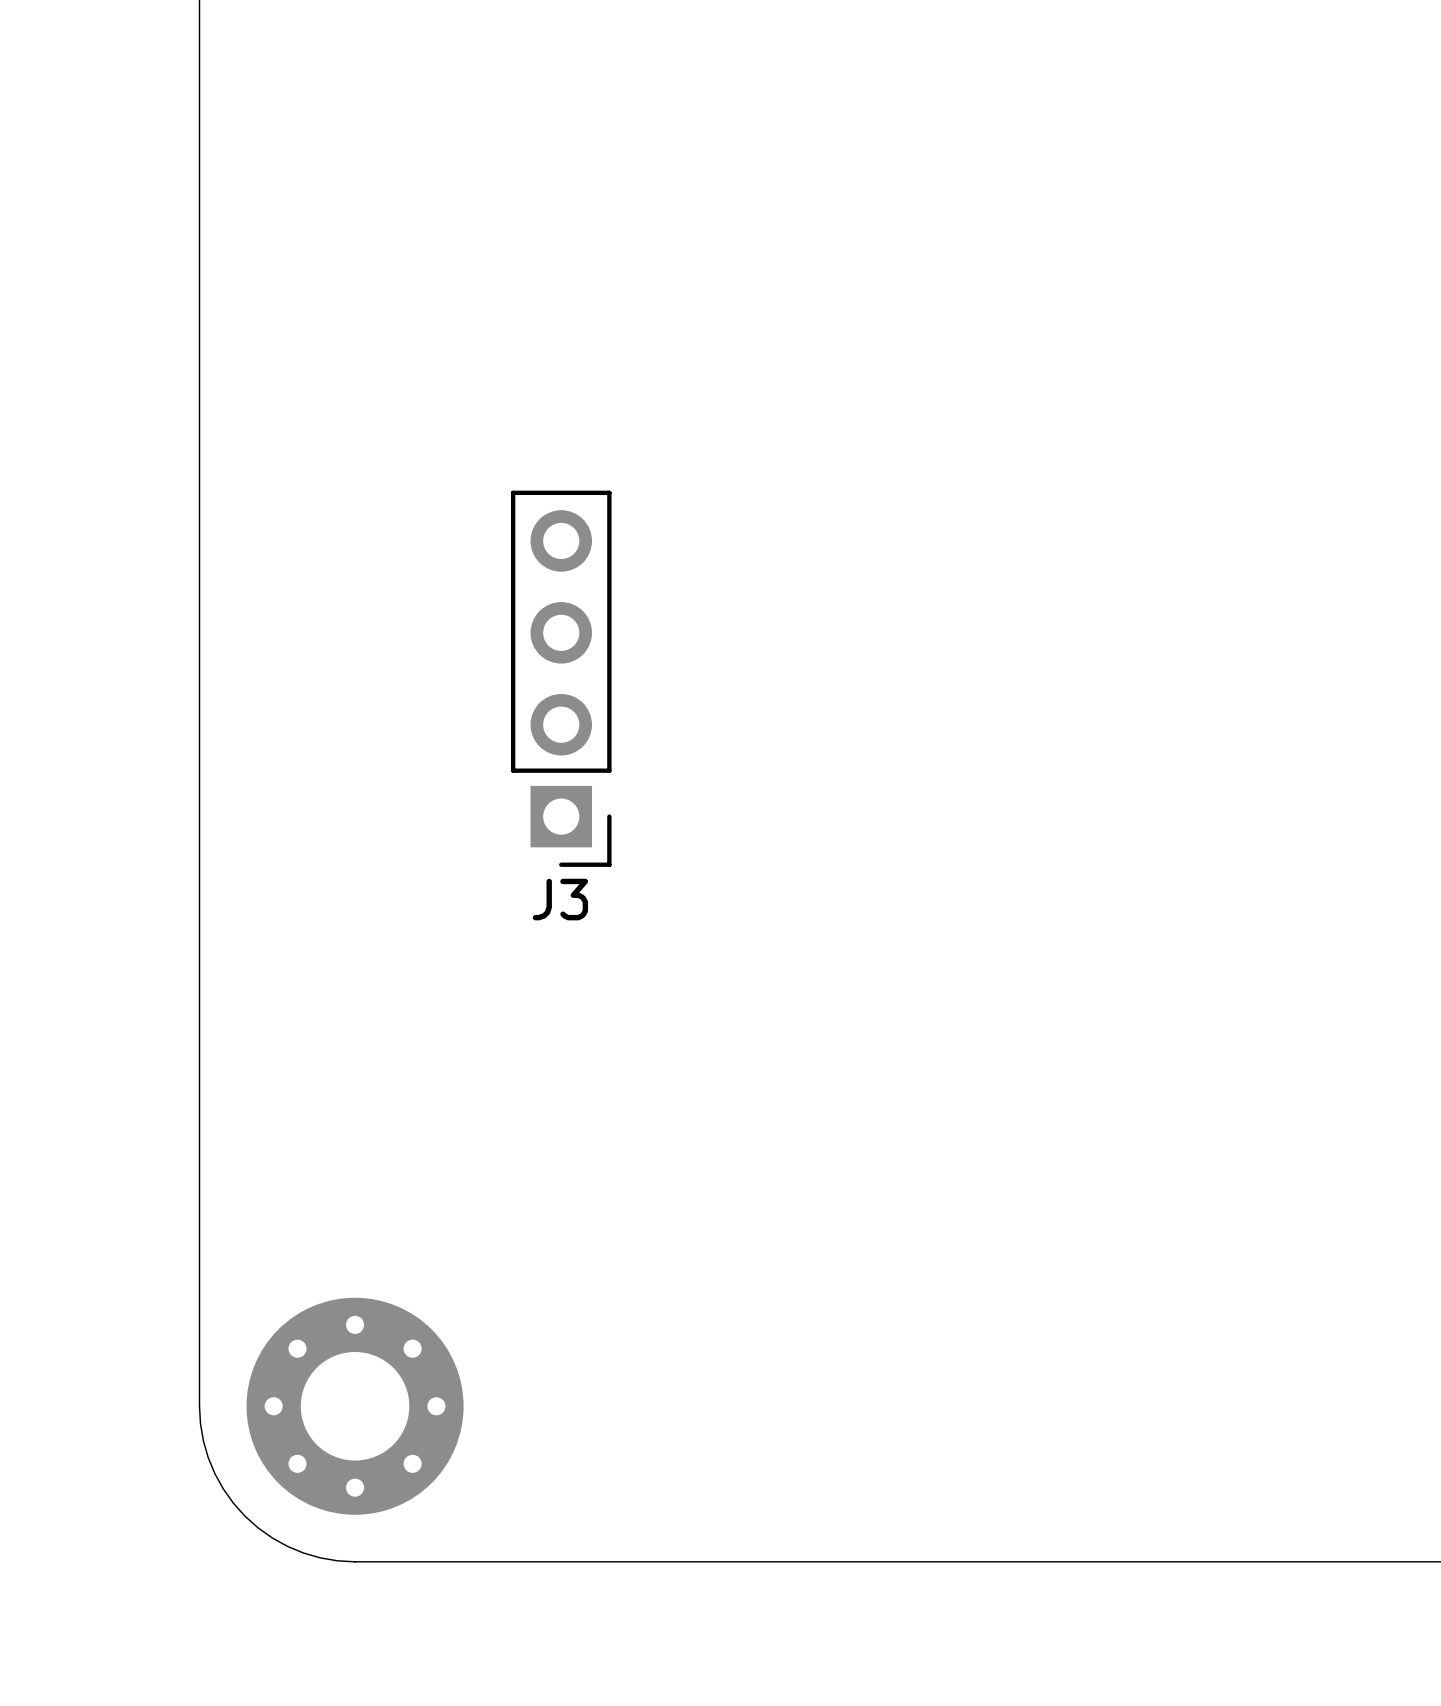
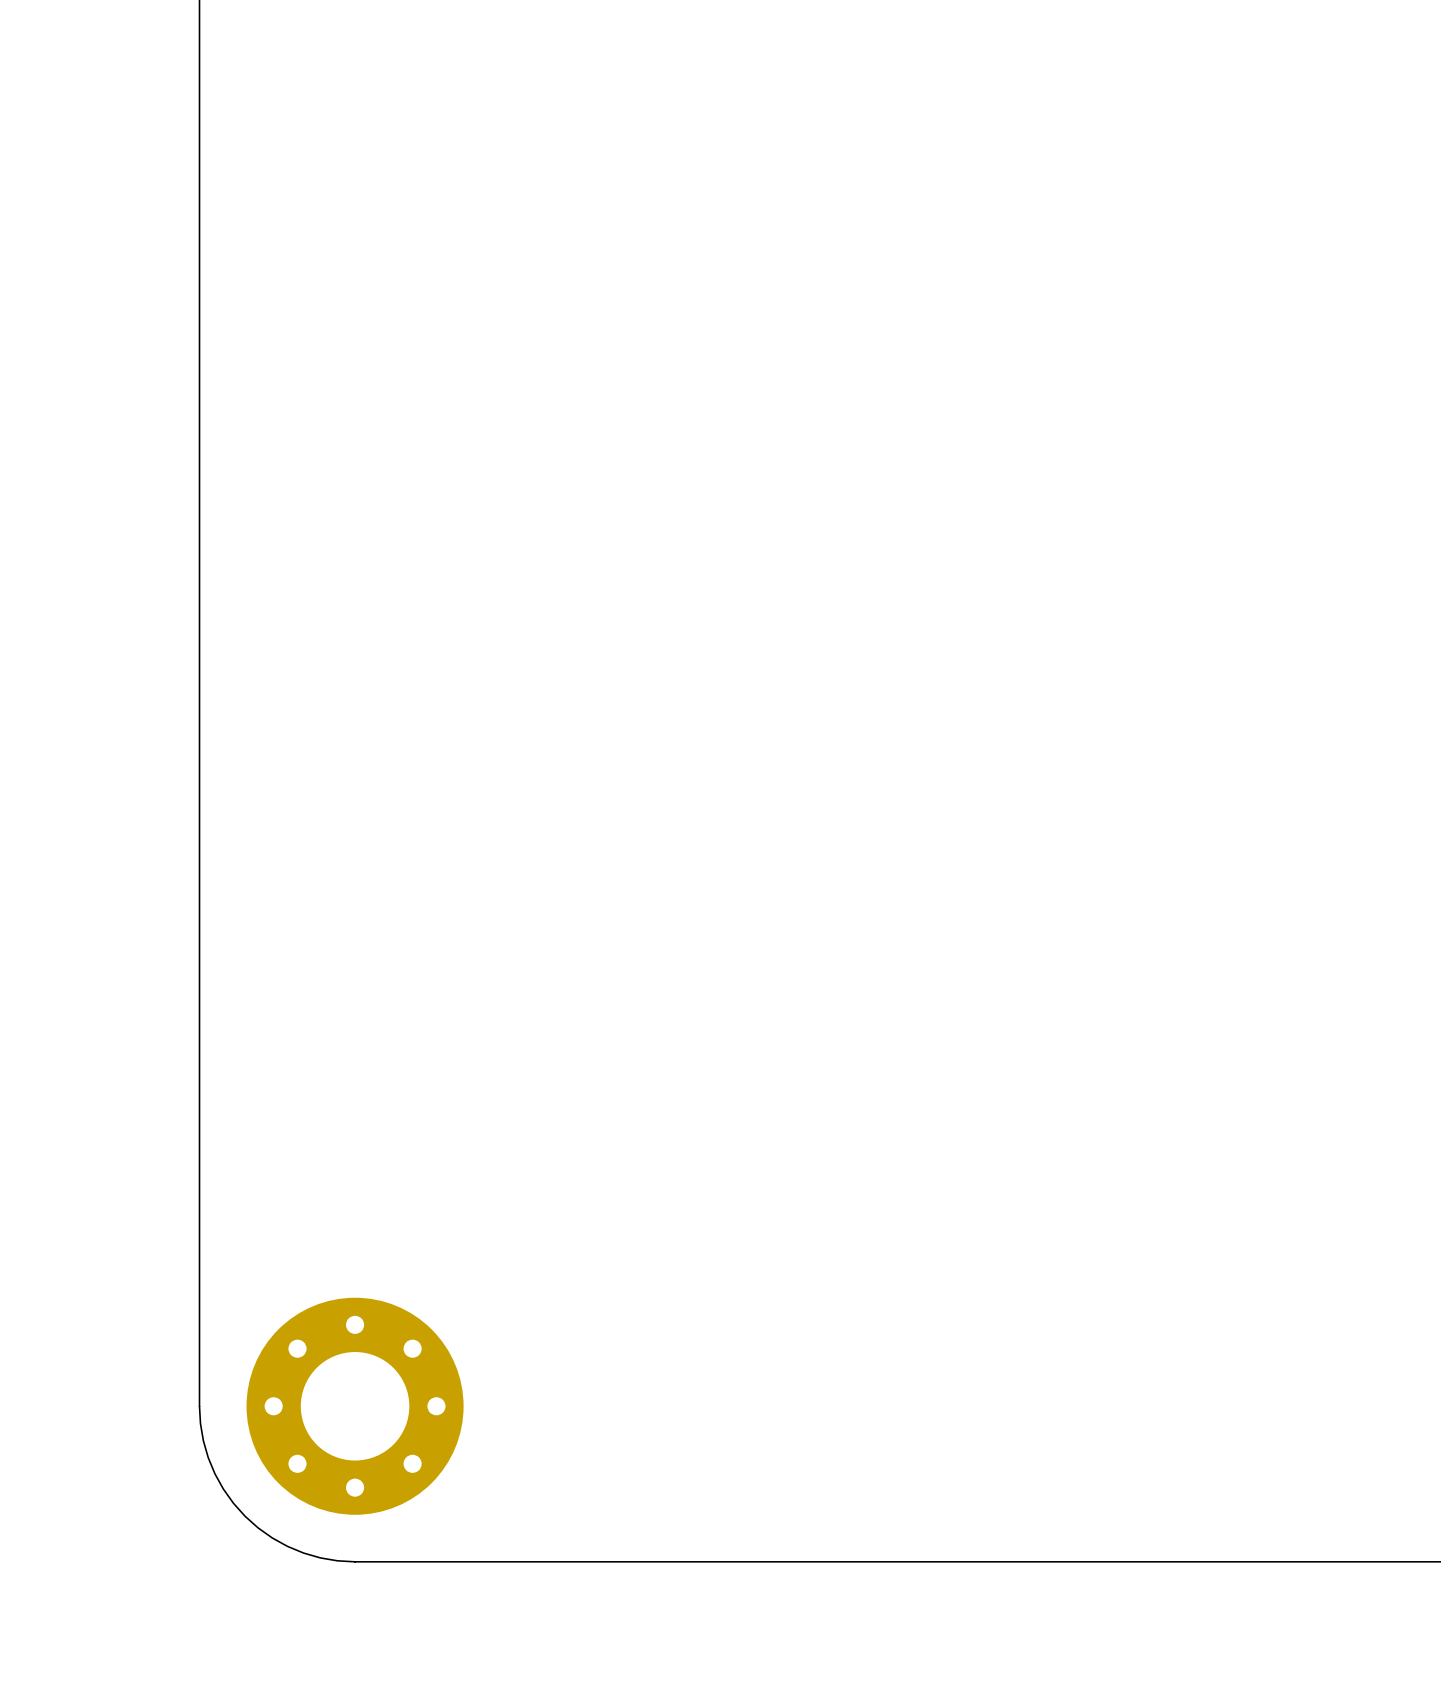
J3: (561, 678) -> none

